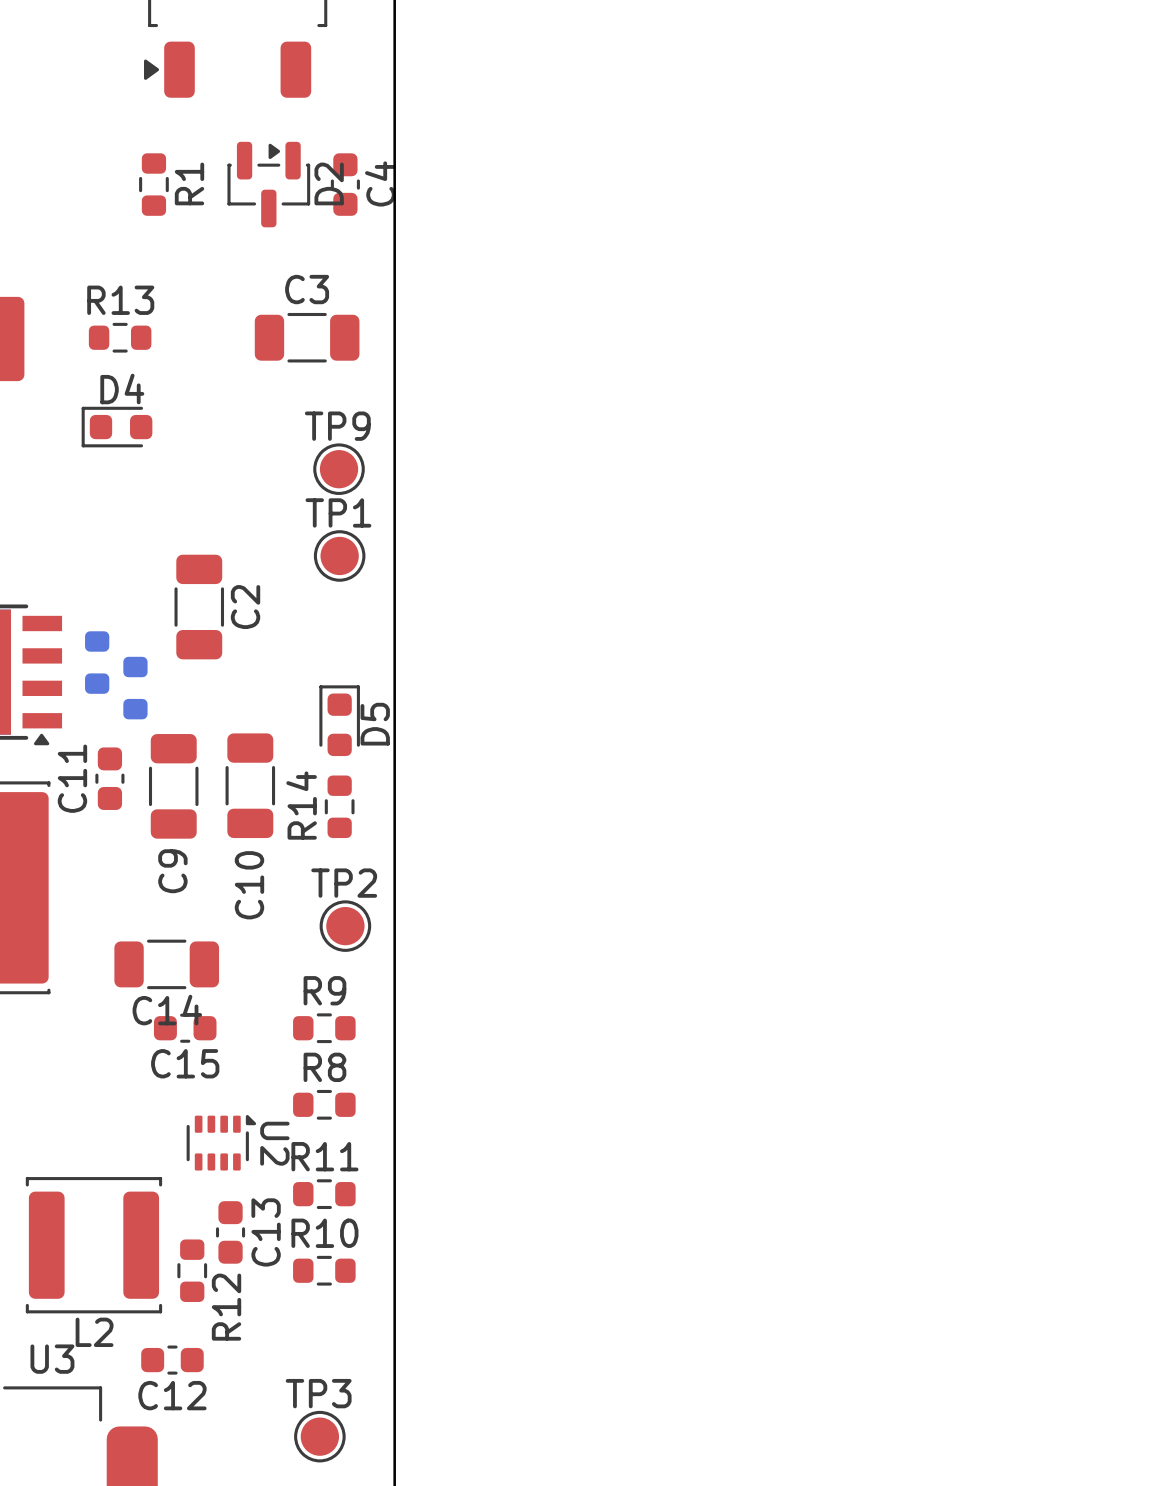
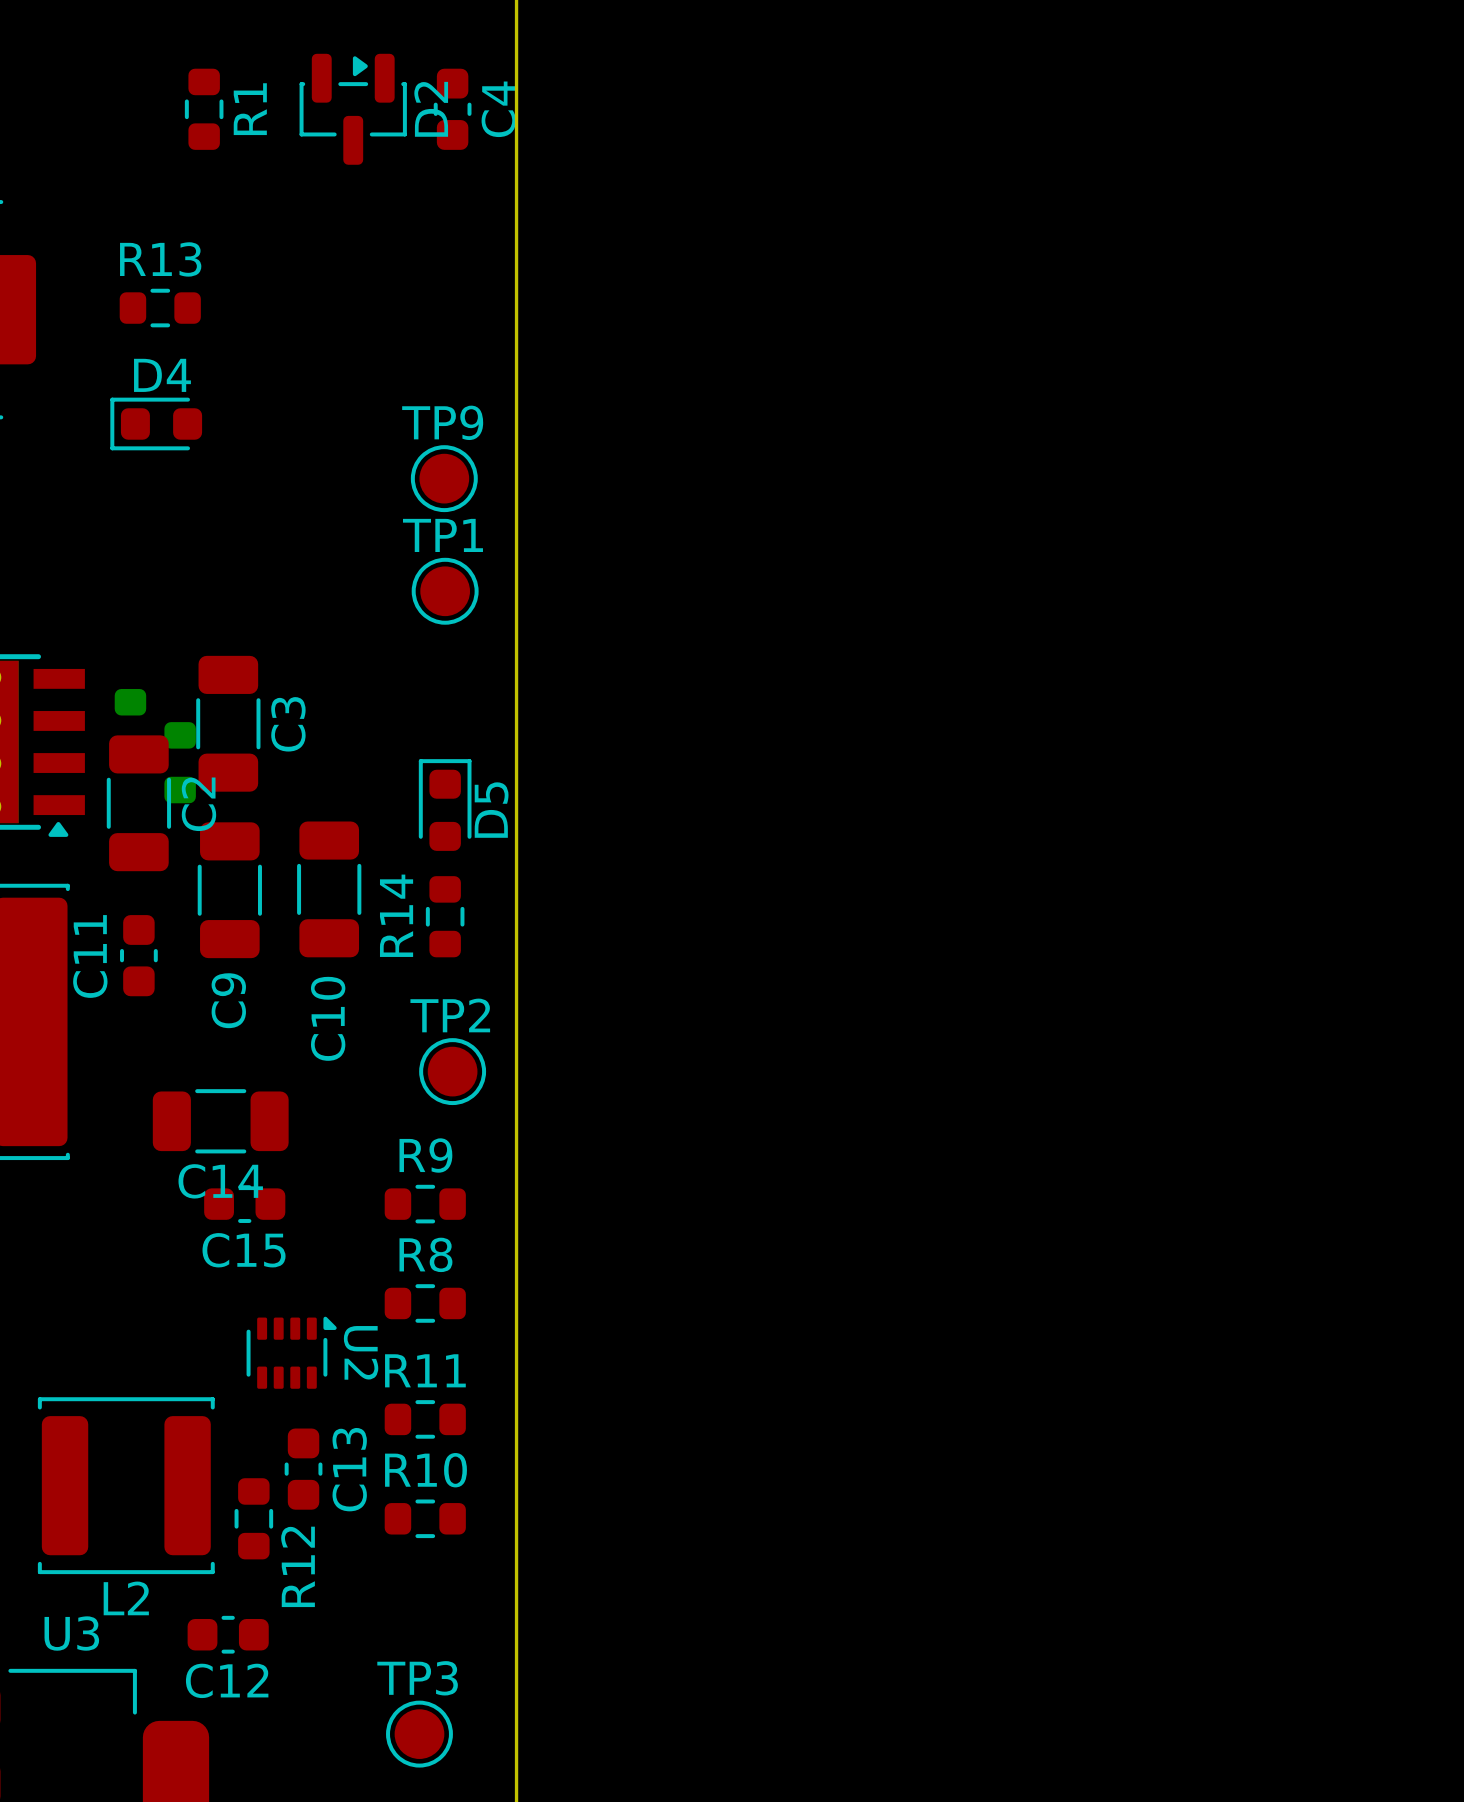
C3 rotation: 0° (307, 337) -> 90° clockwise (228, 723)
C3 position: (307, 337) -> (228, 723)
C2 position: (199, 607) -> (138, 803)
C11 position: (109, 778) -> (138, 955)

